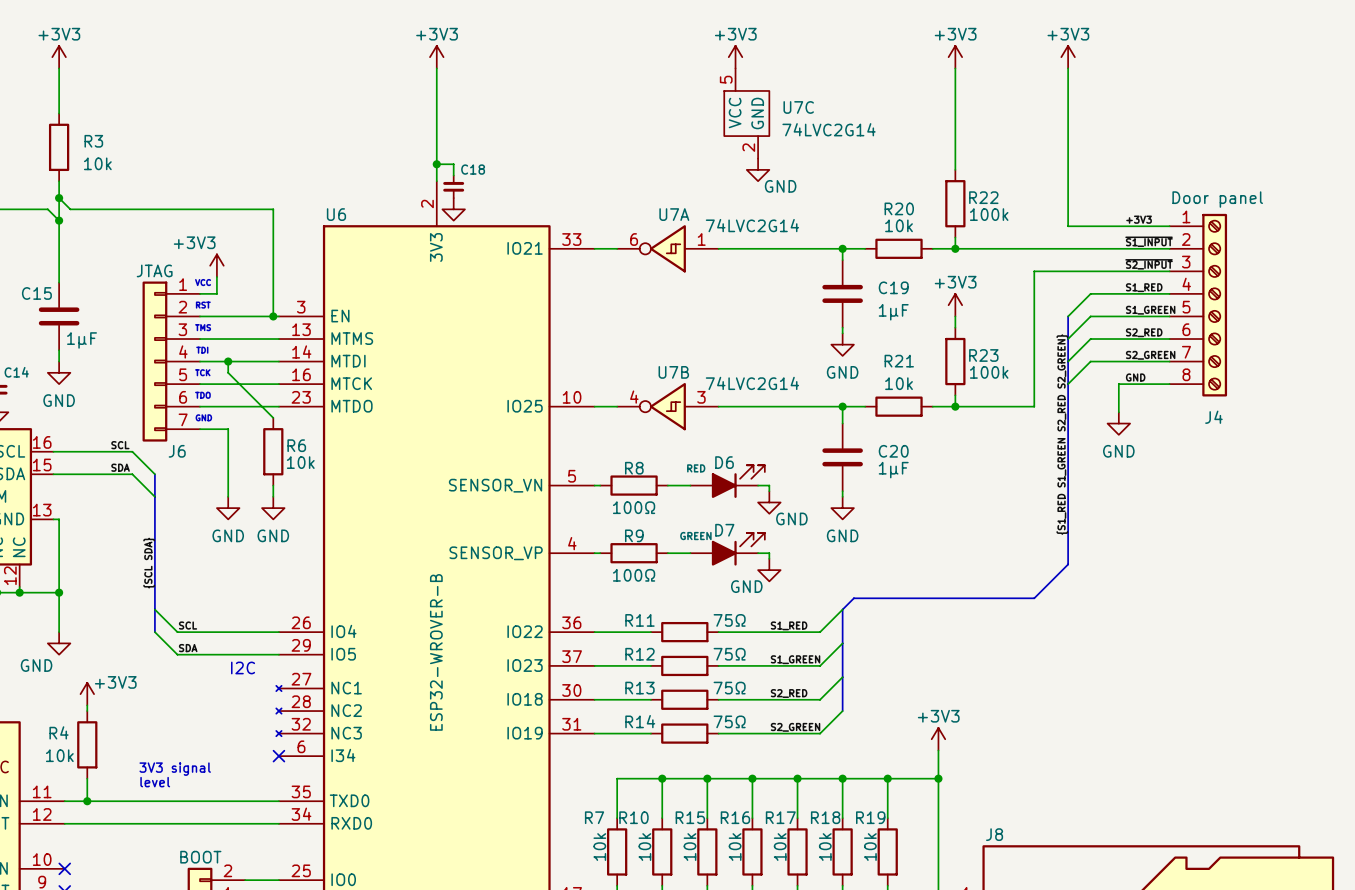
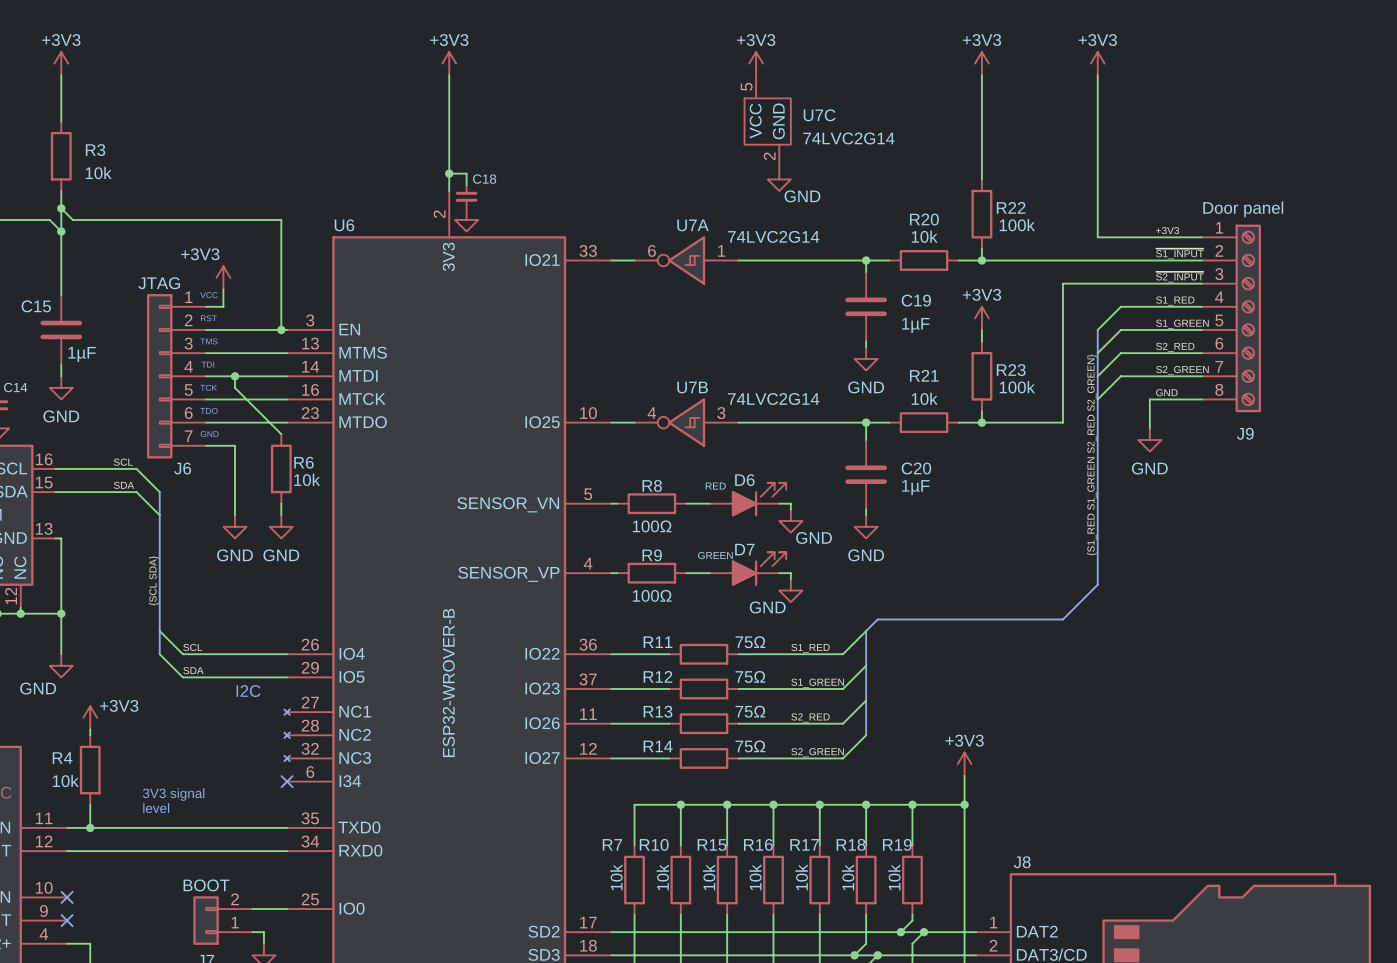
J4 name: J4 (1213, 417) -> J9 (1245, 433)
U6 pin number: 30 (571, 690) -> 11 (588, 714)
U6 pin name: IO18 (525, 699) -> IO26 (542, 723)
U6 pin number: 31 (571, 724) -> 12 (588, 748)
U6 pin name: IO19 (525, 733) -> IO27 (542, 758)

